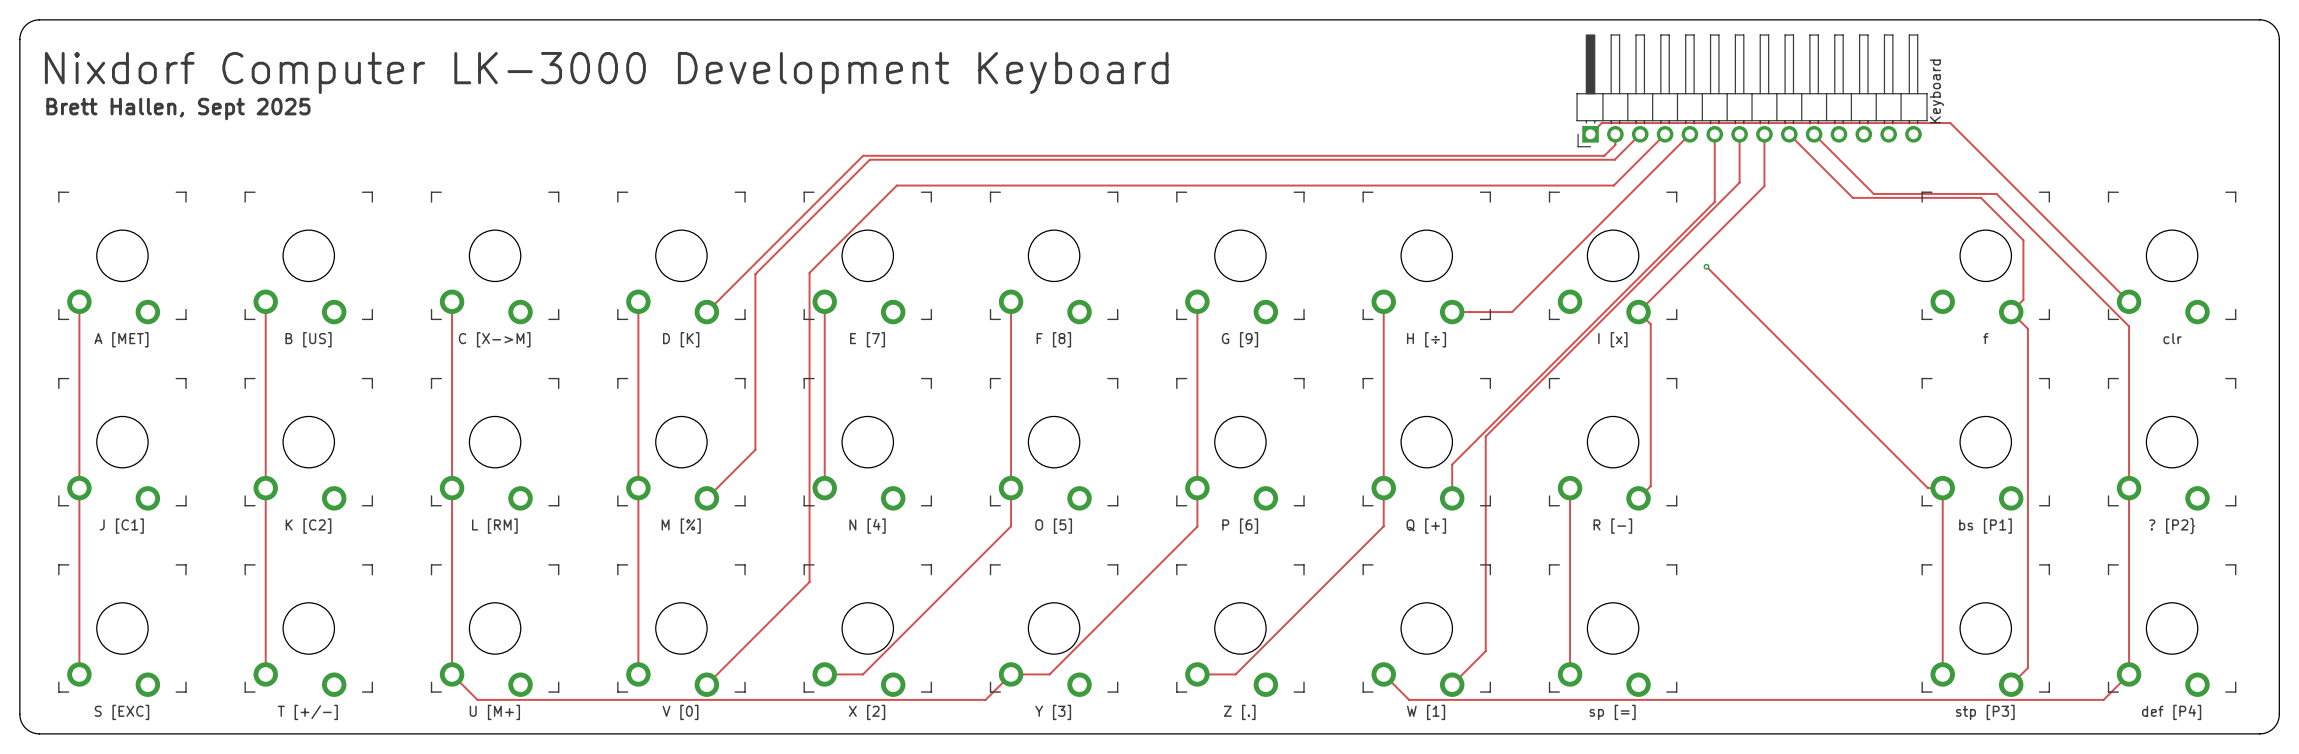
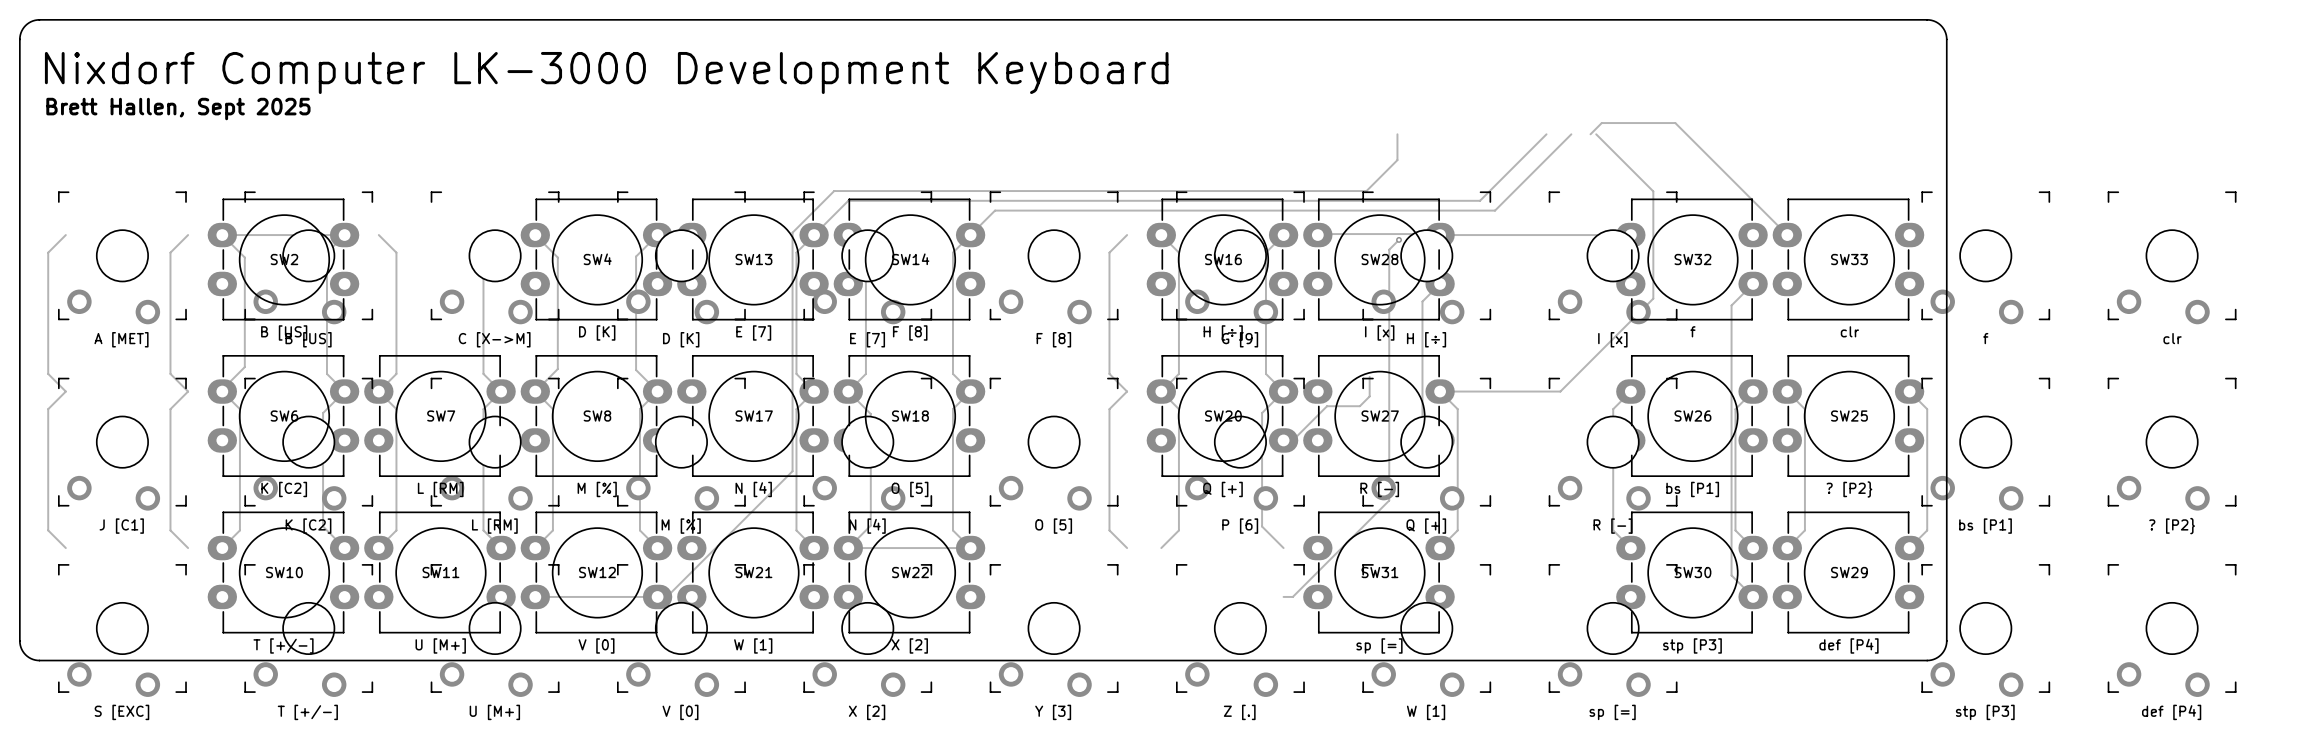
board edge: (1927, 19) (2259, 19) (2270, 22) (2277, 30) (2279, 39) (2279, 714) (2276, 724) (2268, 731) (2259, 733) (39, 733) (27, 729) (20, 718) (19, 640) -> (1927, 19) (1941, 25) (1946, 39) (1946, 640) (1942, 653) (1933, 659) (39, 660) (25, 654) (19, 640)
part: Keyboard (1752, 90) -> none
track: (1675, 123) (1950, 123) (2129, 301) -> (1675, 123) (1787, 235)
track: none -> (1397, 134) (1397, 160) (1366, 191) (834, 191) (792, 232) (792, 471) (666, 596) (535, 596)
track: none -> (1546, 134) (1480, 200) (848, 200) (796, 252) (796, 373) (814, 391) (796, 409) (796, 530) (814, 548)
track: none -> (1571, 134) (1495, 210) (995, 210) (952, 252) (952, 373) (970, 391) (952, 409) (952, 530) (970, 548) (848, 548) (870, 525) (870, 414) (848, 391) (865, 373) (865, 252) (848, 235)
track: none -> (1596, 134) (1653, 191) (1653, 298) (1560, 391) (1440, 391) (1457, 409) (1457, 530) (1440, 548)
track: (1615, 134) (1615, 144) (1604, 155) (863, 155) (706, 312) -> none
track: (1640, 134) (1614, 159) (869, 159) (755, 274) (755, 449) (706, 498) -> none
track: (1665, 134) (1613, 185) (896, 185) (809, 272) (809, 582) (706, 684) -> none
track: (1689, 134) (1512, 312) (1452, 312) -> none
track: (1714, 134) (1714, 201) (1452, 464) (1452, 498) -> none
track: (1739, 134) (1739, 182) (1485, 436) (1485, 651) (1452, 684) -> none
track: (1764, 134) (1764, 186) (1638, 312) (1650, 324) (1650, 486) (1638, 498) -> none
track: (1789, 134) (1852, 197) (1981, 197) (2023, 240) (2023, 299) (2011, 312) (2027, 328) (2027, 667) (2011, 684) -> none
track: (1814, 134) (1873, 193) (1996, 193) (2129, 326) (2129, 674) (2103, 699) (1409, 699) (1383, 674) -> none
track: none -> (65, 235) (48, 252) (48, 373) (65, 391) (48, 409) (48, 530) (65, 548)
track: none -> (188, 235) (170, 252) (170, 373) (188, 391) (170, 409) (170, 530) (188, 548)
track: none -> (378, 235) (396, 252) (396, 373) (378, 391) (396, 409) (396, 530) (378, 548)
track: none -> (501, 235) (483, 252) (483, 373) (501, 391) (483, 409) (483, 530) (501, 548)
track: none -> (535, 235) (557, 257) (557, 369) (535, 391) (552, 409) (552, 530) (535, 548)
track: none -> (657, 235) (636, 256) (636, 370) (657, 391) (639, 409) (639, 530) (657, 548)
track: none -> (1127, 235) (1109, 252) (1109, 373) (1127, 391) (1109, 409) (1109, 530) (1127, 548)
track: none -> (1161, 235) (1178, 252) (1178, 373) (1161, 391) (1178, 409) (1178, 530) (1161, 548)
track: none -> (1283, 235) (1265, 252) (1265, 373) (1283, 391) (1262, 413) (1262, 526) (1283, 548)
track: none -> (1317, 235) (1630, 235)
track: none -> (1399, 239) (1389, 249) (1389, 500) (1292, 596) (1283, 596)
via: none -> (1399, 239)
SW2: none -> B [US] (283, 259)
SW4: none -> D [K] (596, 259)
SW13: none -> E [7] (752, 259)
SW14: none -> F [8] (909, 259)
SW16: none -> H [÷] (1222, 259)
SW28: none -> I [x] (1378, 259)
SW32: none -> f (1691, 259)
SW33: none -> clr (1848, 259)
track: (1706, 266) (1927, 488) (1942, 488) (1942, 674) -> none
via: (1706, 266) -> none
track: none -> (1440, 283) (1422, 301) (1422, 422) (1440, 440)
track: none -> (1753, 283) (1731, 305) (1731, 575) (1753, 596)
track: (79, 301) (79, 674) -> none
track: (265, 301) (265, 674) -> none
track: (452, 301) (452, 674) (477, 699) (985, 699) (1011, 674) (1049, 674) (1197, 526) (1197, 301) -> none
track: (638, 301) (638, 674) -> none
track: (824, 301) (824, 488) -> none
track: (1011, 301) (1011, 526) (862, 674) (824, 674) -> none
track: (1383, 301) (1383, 526) (1235, 674) (1197, 674) -> none
track: none -> (1369, 376) (1369, 396) (1359, 406) (1327, 406) (1292, 440) (1283, 440)
track: none -> (1630, 391) (1613, 409) (1613, 530) (1630, 548)
track: none -> (1753, 391) (1735, 409) (1735, 530) (1753, 548)
track: none -> (1787, 391) (1804, 409) (1804, 530) (1787, 548)
track: none -> (1909, 391) (1927, 409) (1927, 530) (1909, 548)
SW6: none -> K [C2] (283, 416)
SW7: none -> L [RM] (439, 416)
SW8: none -> M [%] (596, 416)
SW17: none -> N [4] (752, 416)
SW18: none -> O [5] (909, 416)
SW20: none -> Q [+] (1222, 416)
SW27: none -> R [-] (1378, 416)
SW26: none -> bs [P1] (1691, 416)
SW25: none -> ? [P2} (1848, 416)
track: (1570, 488) (1570, 674) -> none
track: none -> (222, 548) (239, 530) (239, 409) (222, 389) (244, 367) (244, 257) (222, 235) (344, 235) (326, 252) (326, 373) (344, 391) (323, 413) (323, 526) (344, 548)
SW10: none -> T [+/-] (283, 572)
SW11: none -> U [M+] (439, 572)
SW12: none -> V [0] (596, 572)
SW21: none -> W [1] (752, 572)
SW22: none -> X [2] (909, 572)
SW31: none -> sp [=] (1378, 572)
SW30: none -> stp [P3] (1691, 572)
SW29: none -> def [P4] (1848, 572)

